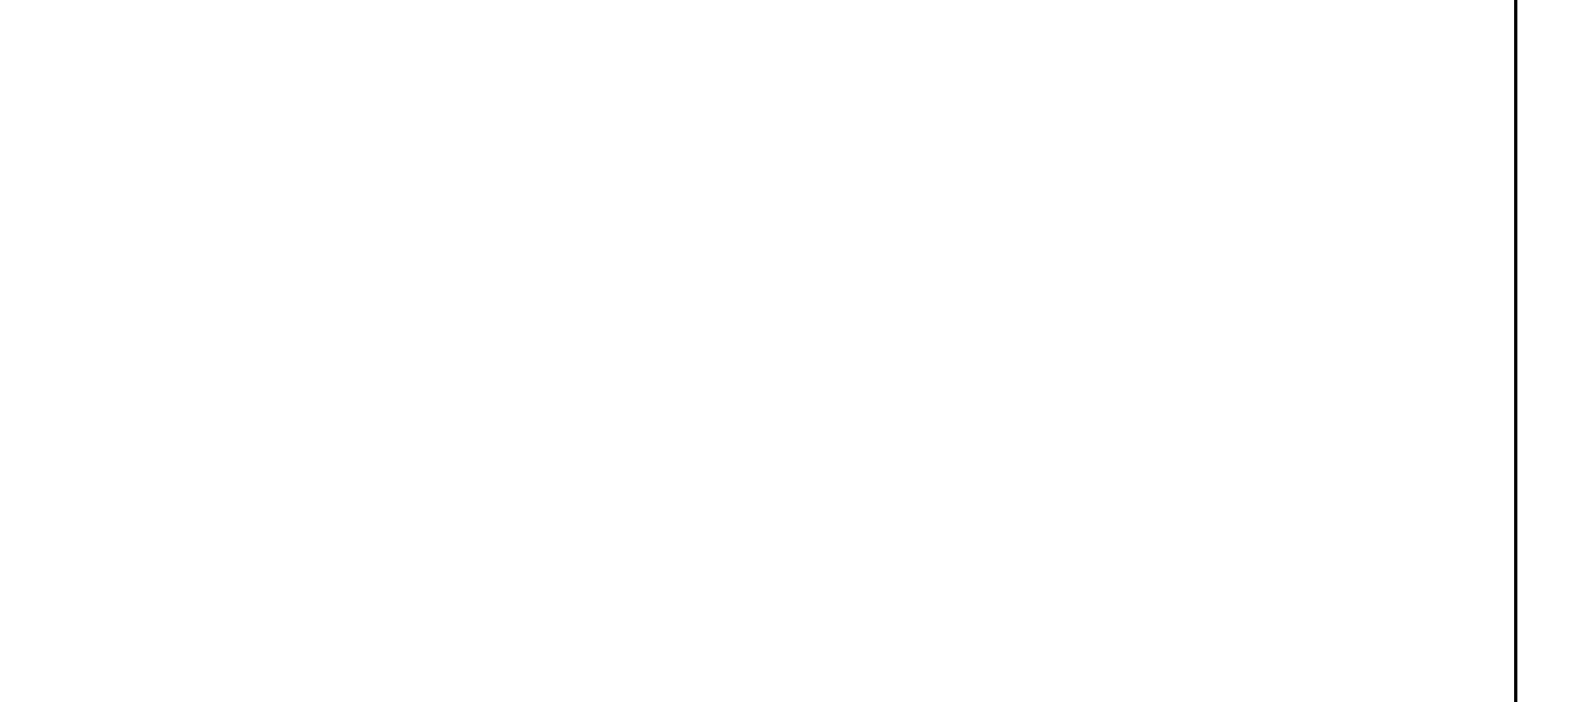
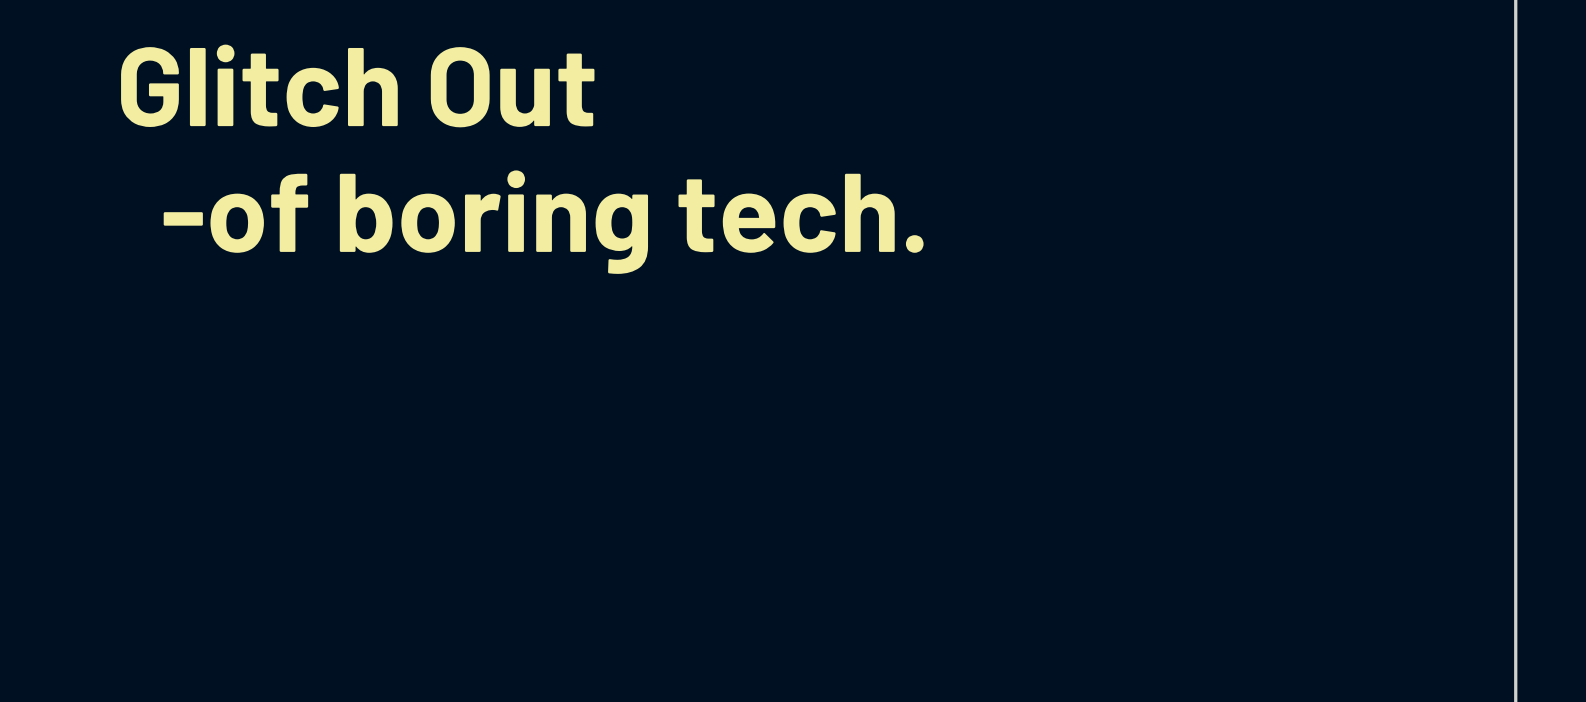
text: none -> Glitch Out (357, 85)
text: none -> -of boring tech. (543, 222)

